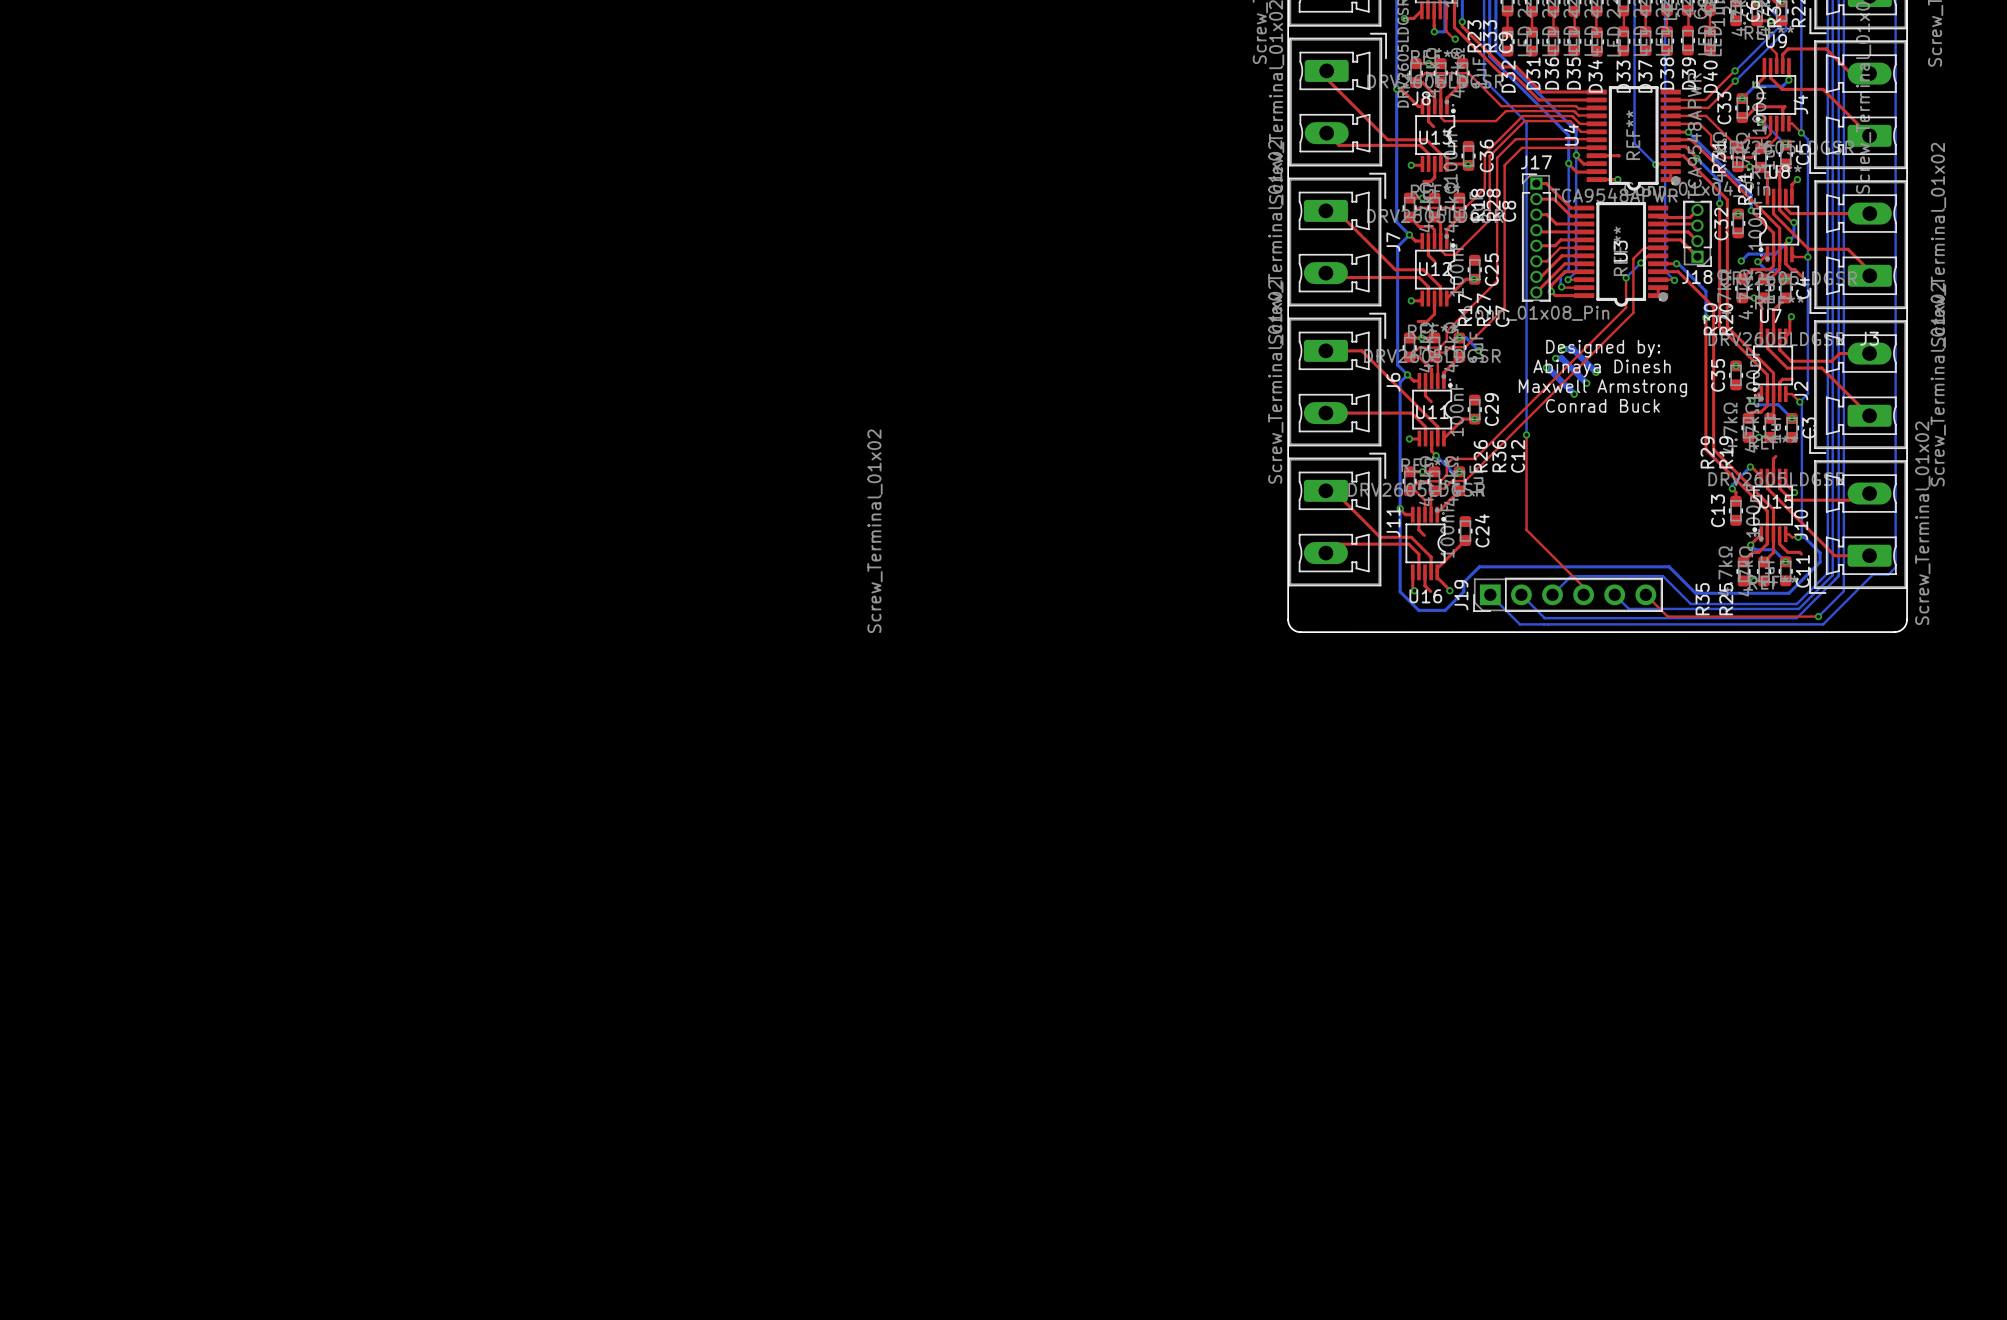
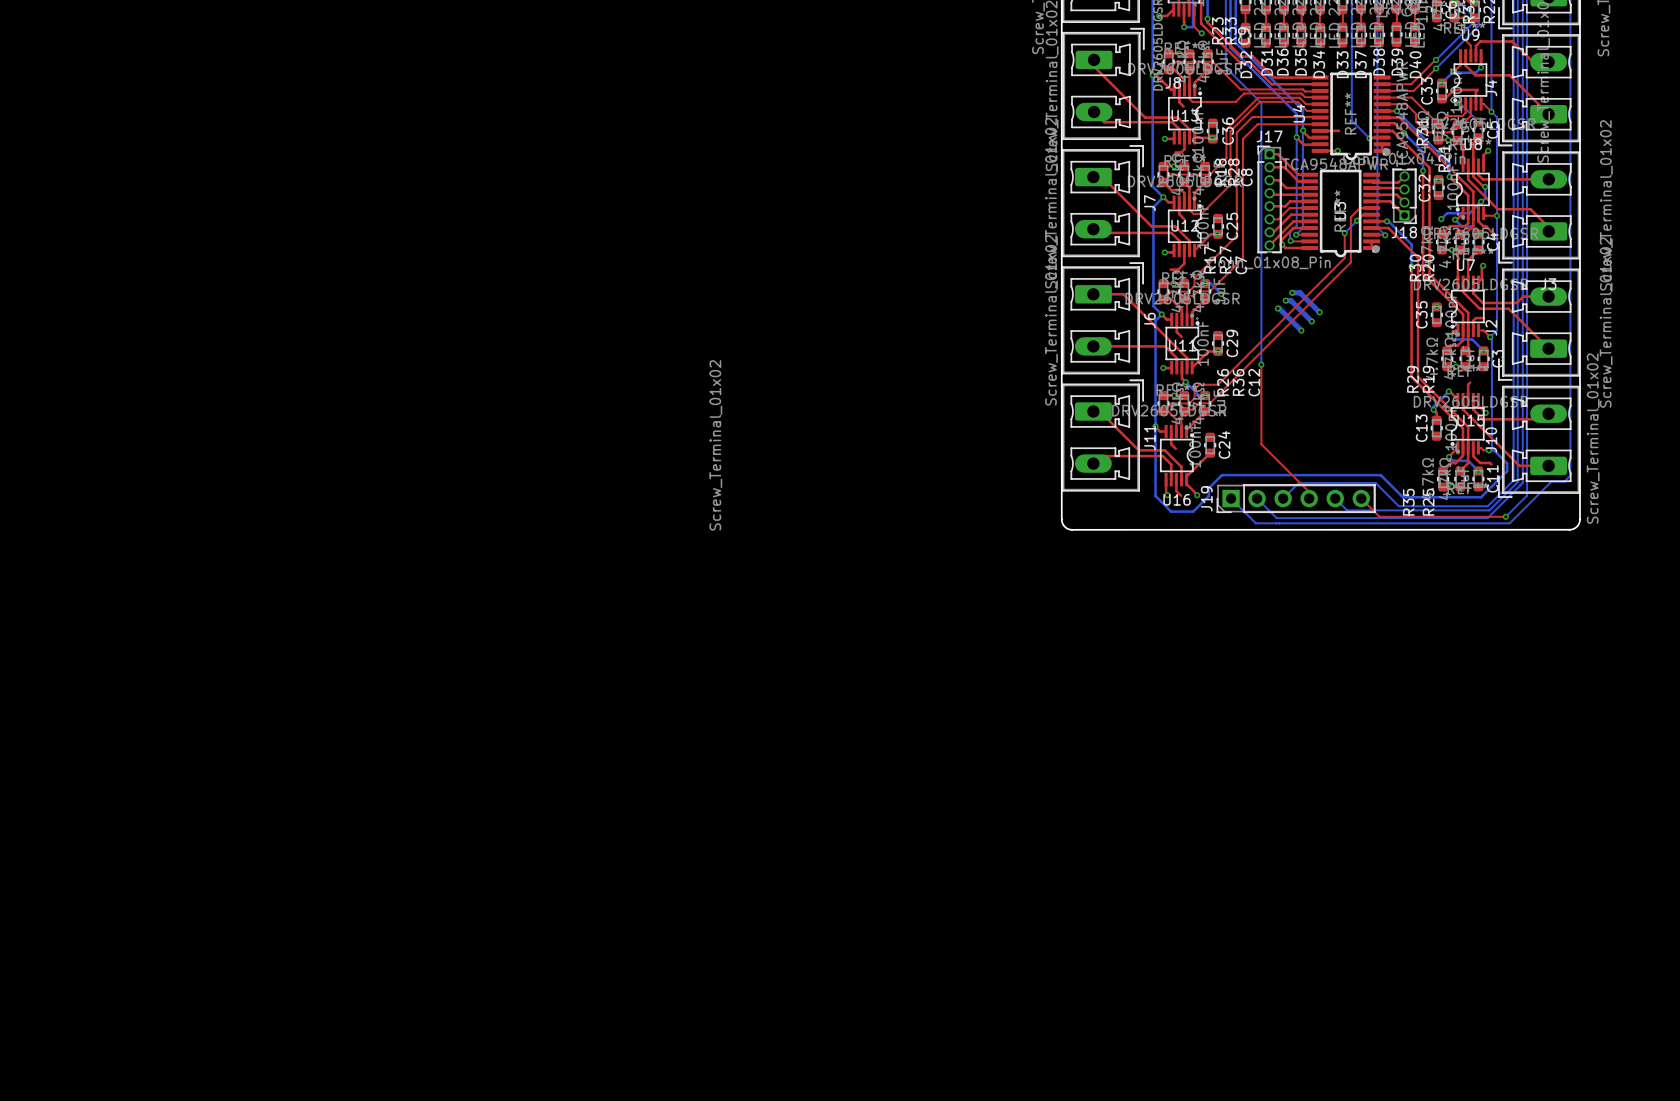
text: Designed by: (1603, 348) -> none
text: Abinaya Dinesh (1602, 368) -> none
text: Maxwell Armstrong (1602, 388) -> none
text: Conrad Buck (1602, 405) -> none

